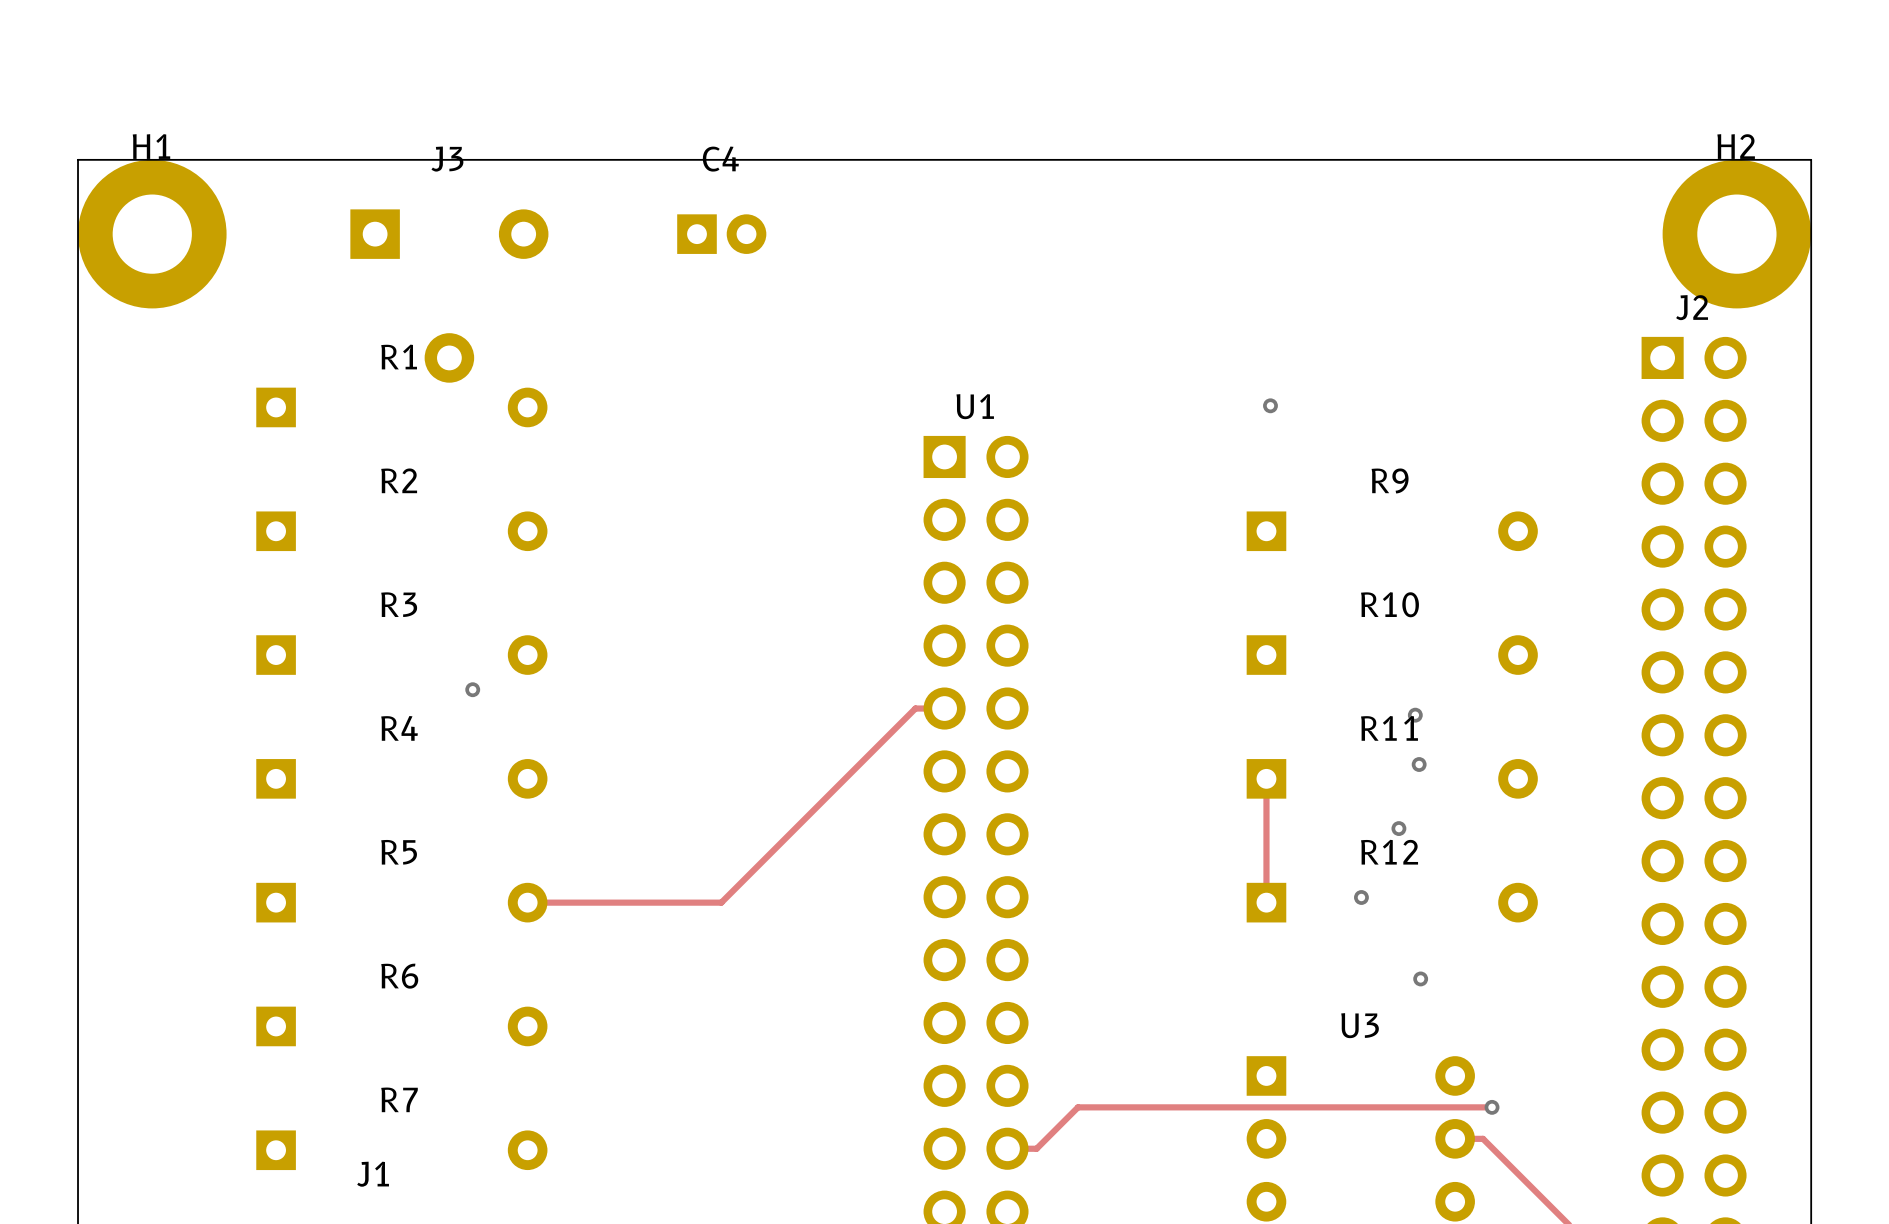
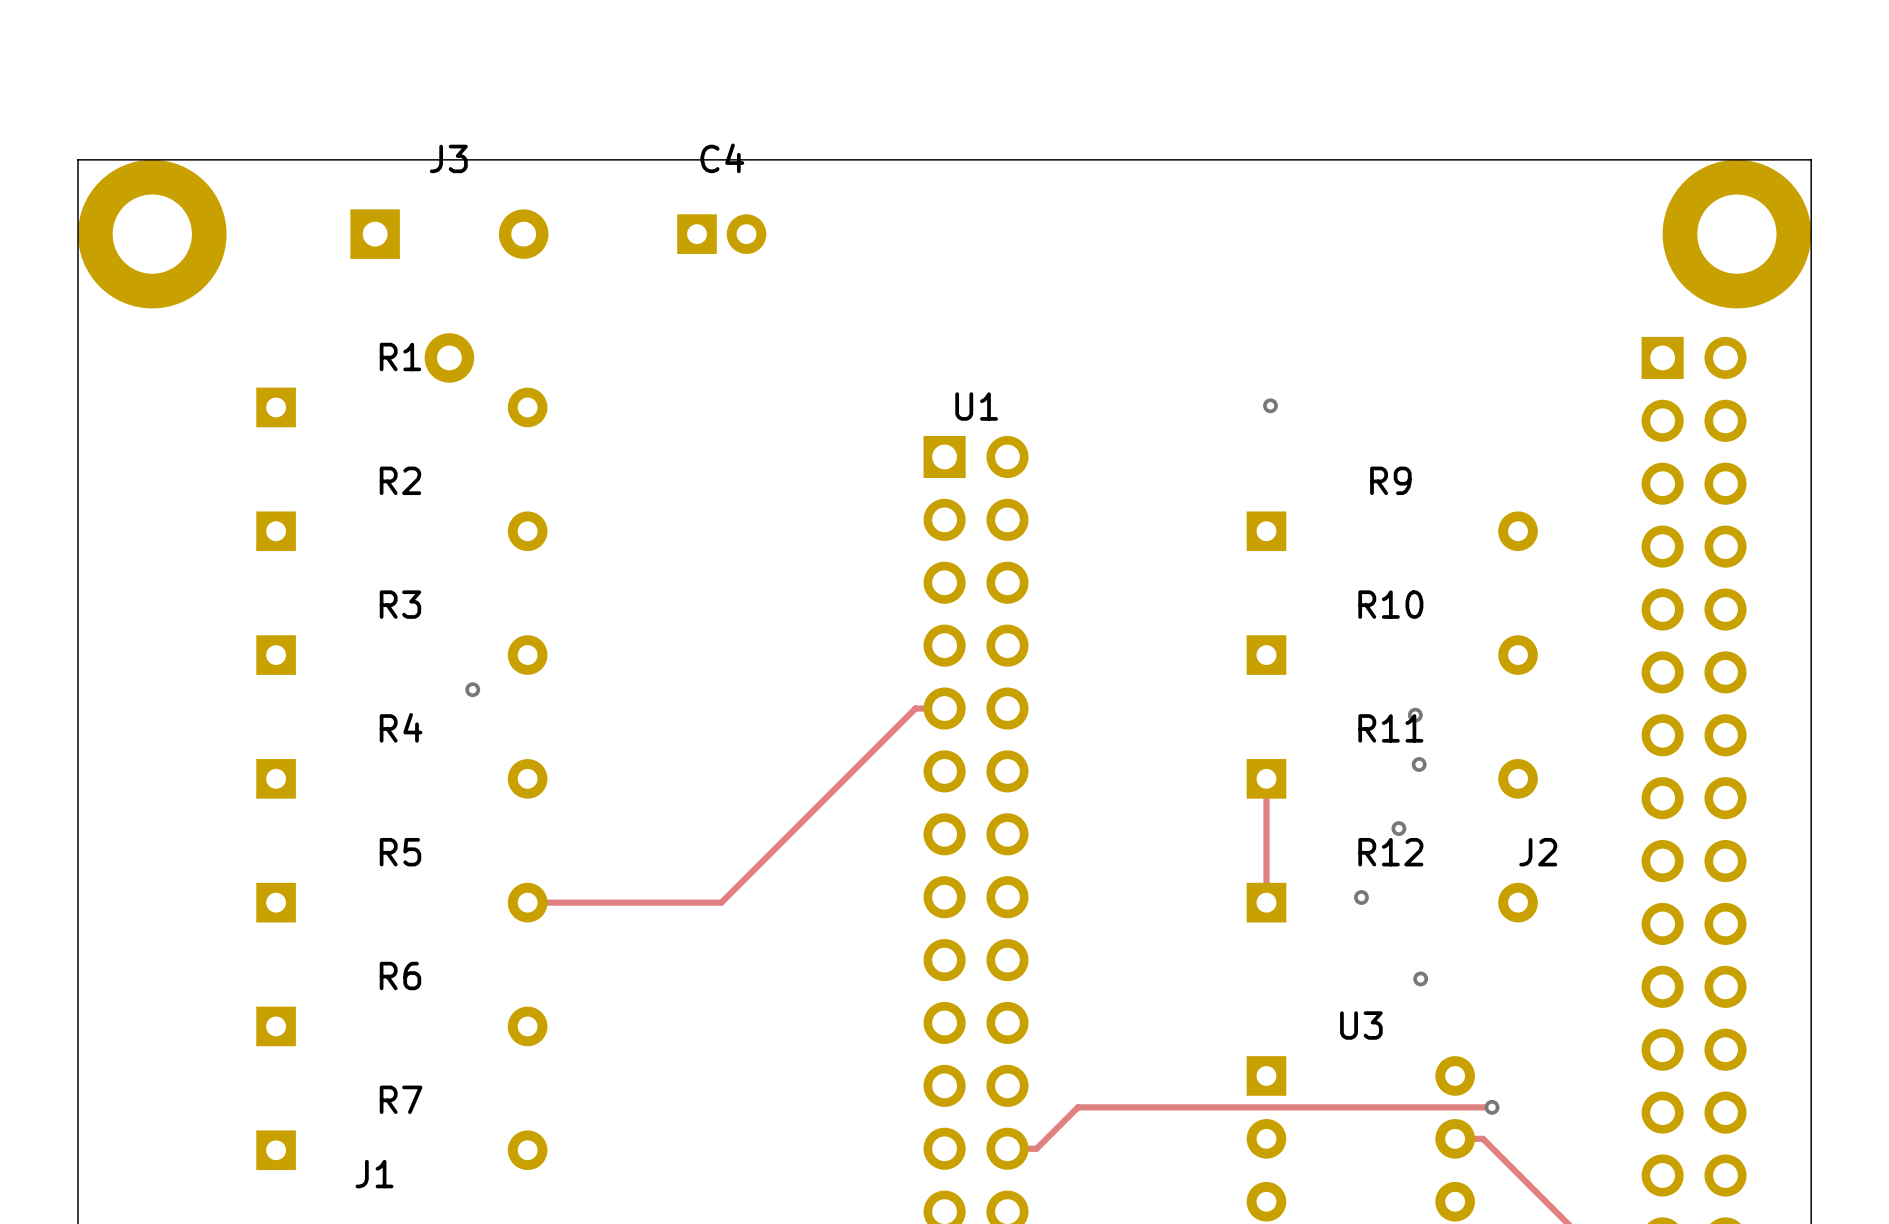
H1 name: H1 (151, 146) -> none
H2 name: H2 (1736, 146) -> none
J2 name position: J2 (1692, 307) -> J2 (1538, 852)

